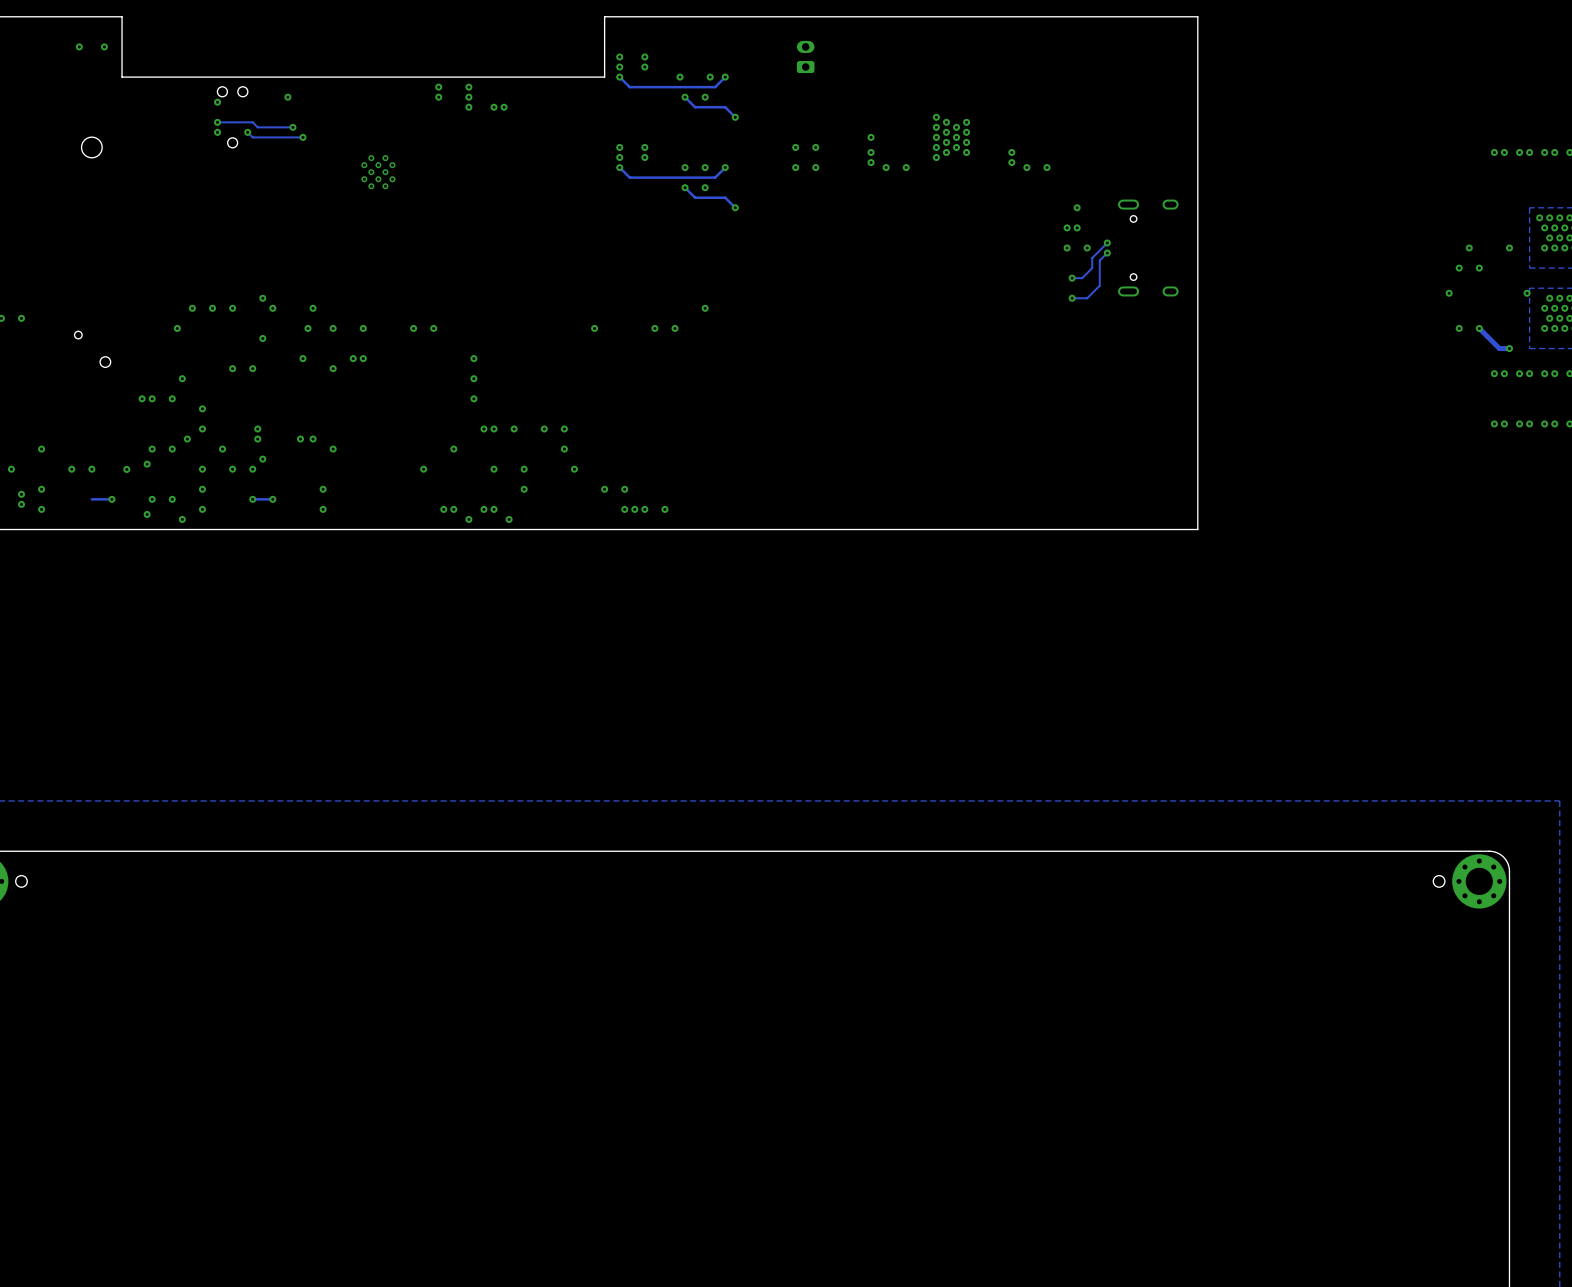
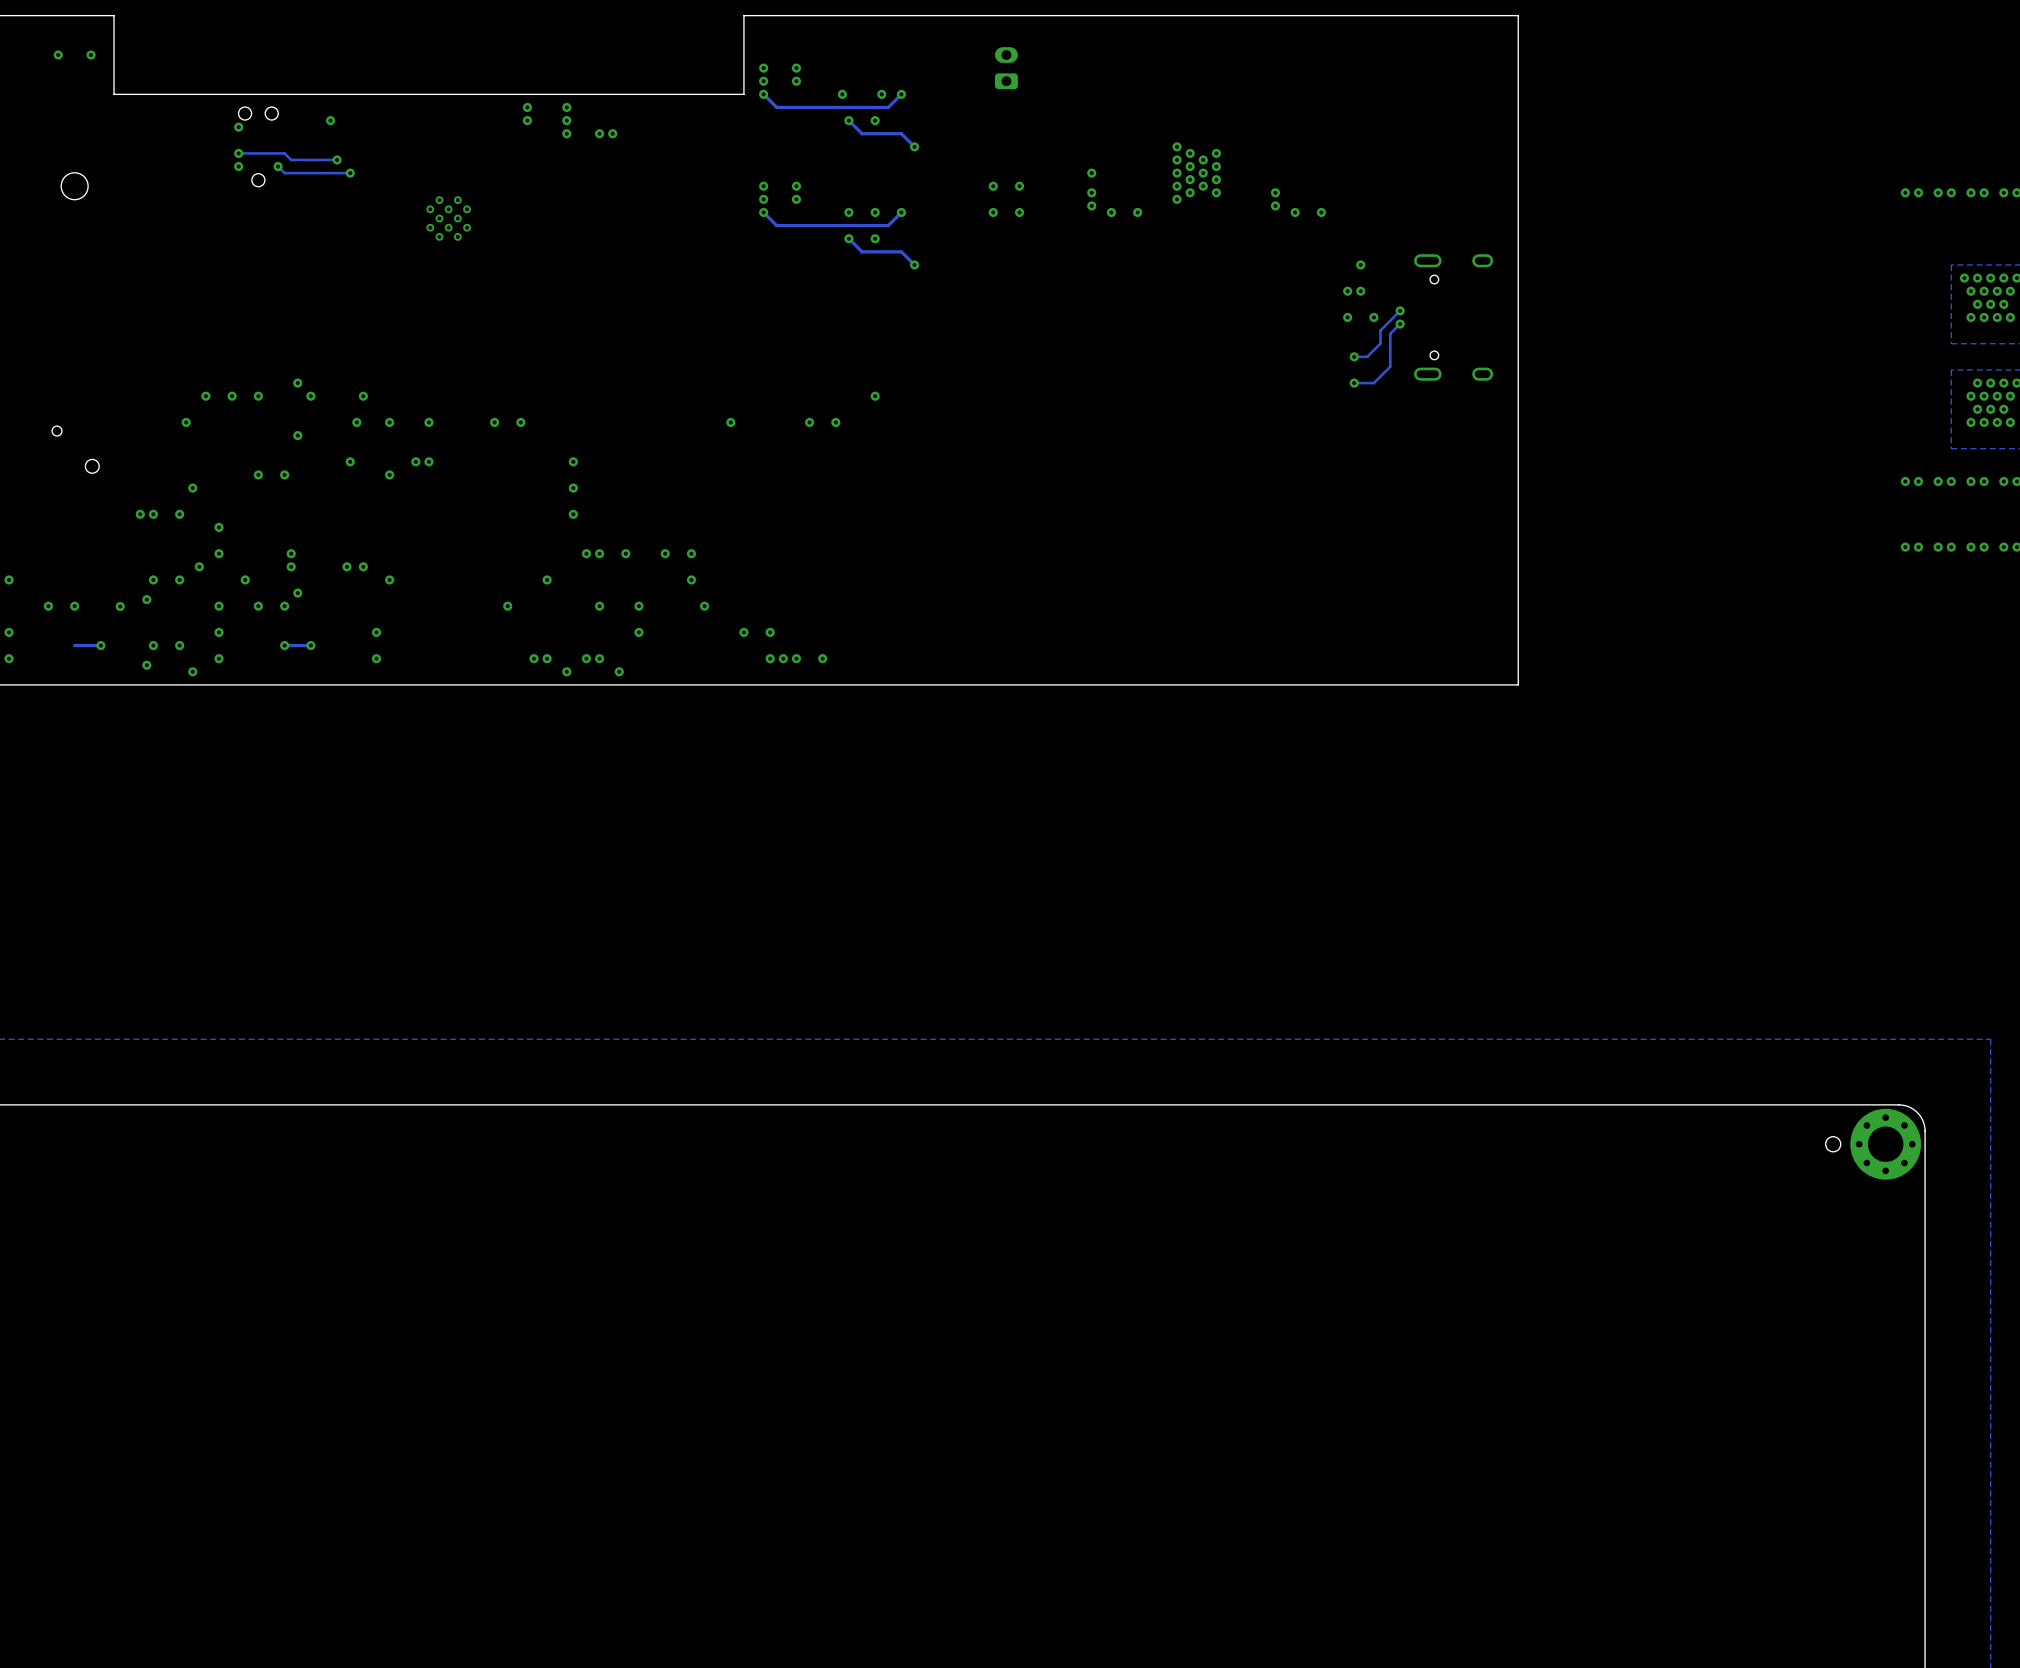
via: (1469, 248) -> none
via: (1509, 248) -> none
via: (1459, 268) -> none
via: (1479, 268) -> none
via: (1449, 293) -> none
via: (1527, 293) -> none
via: (1459, 328) -> none
track: (1479, 328) (1499, 348) (1509, 348) -> none
via: (1479, 328) -> none
via: (1509, 348) -> none

